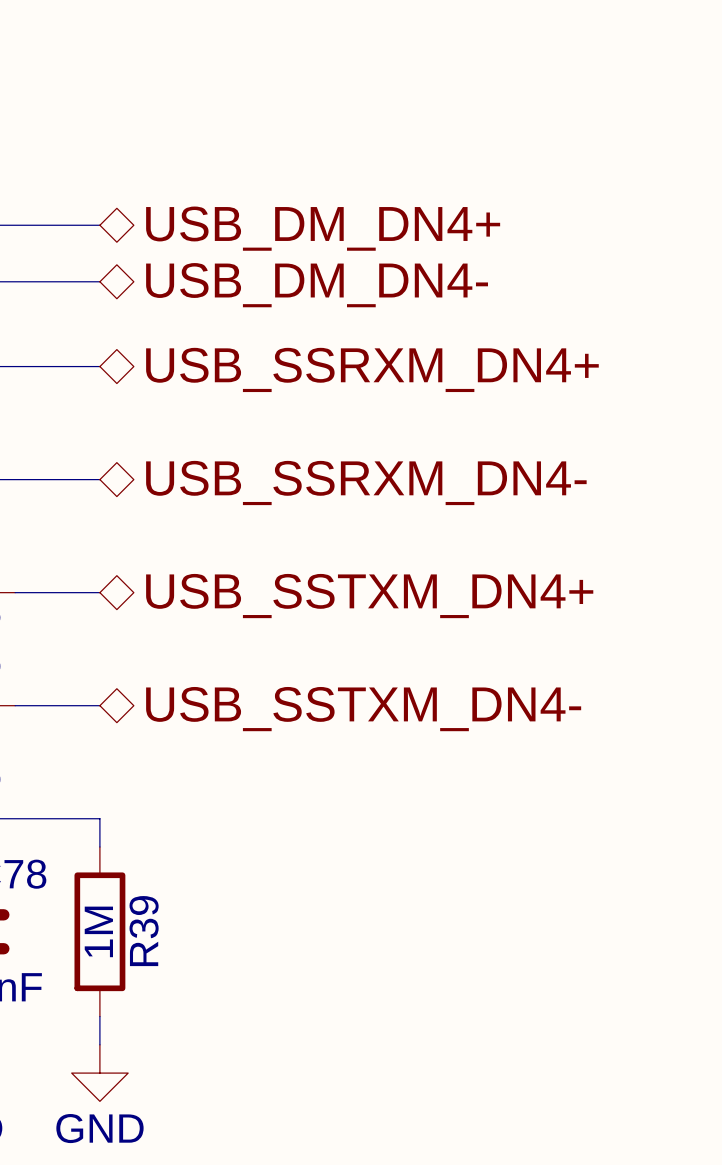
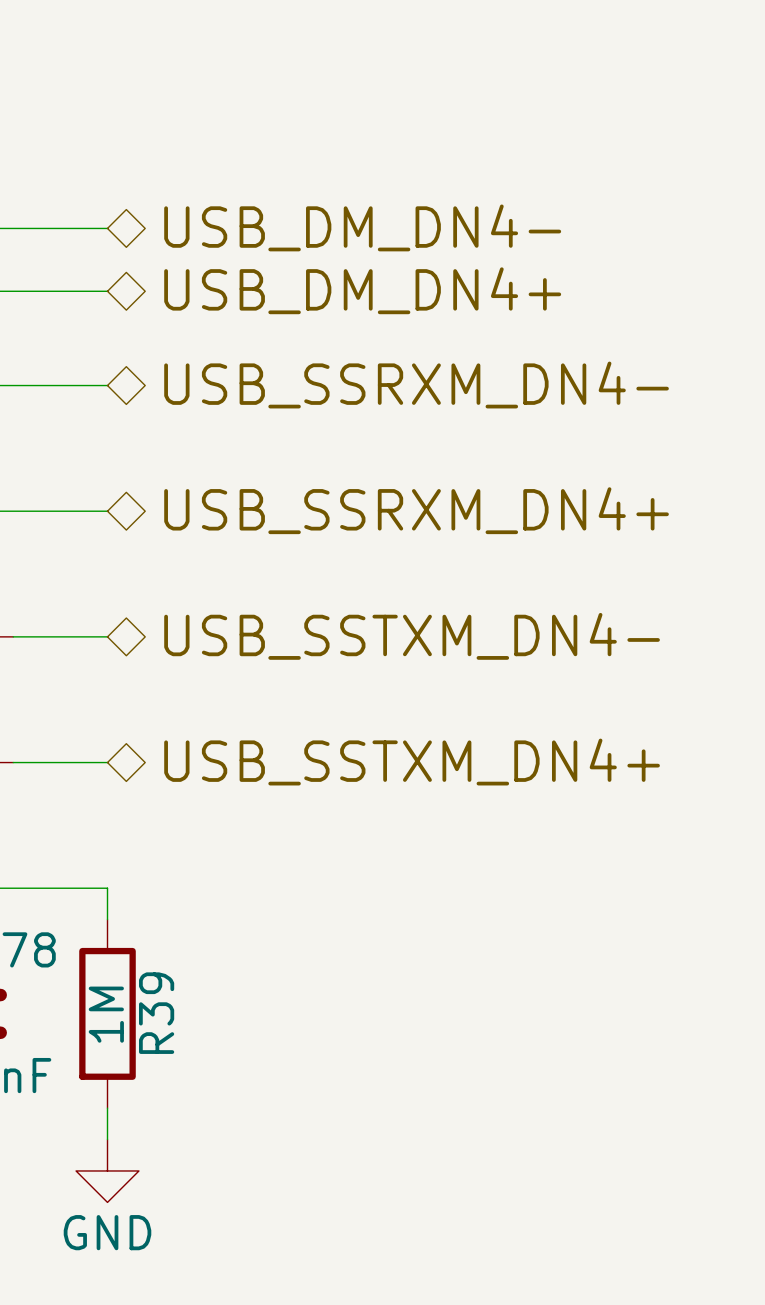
hierarchical label: USB_DM_DN4+ (323, 228) -> USB_DM_DN4- (362, 227)
hierarchical label: USB_DM_DN4- (317, 285) -> USB_DM_DN4+ (362, 290)
hierarchical label: USB_SSRXM_DN4+ (372, 369) -> USB_SSRXM_DN4- (416, 385)
hierarchical label: USB_SSRXM_DN4- (366, 482) -> USB_SSRXM_DN4+ (416, 510)
hierarchical label: USB_SSTXM_DN4+ (369, 596) -> USB_SSTXM_DN4- (412, 636)
hierarchical label: USB_SSTXM_DN4- (363, 709) -> USB_SSTXM_DN4+ (412, 762)

